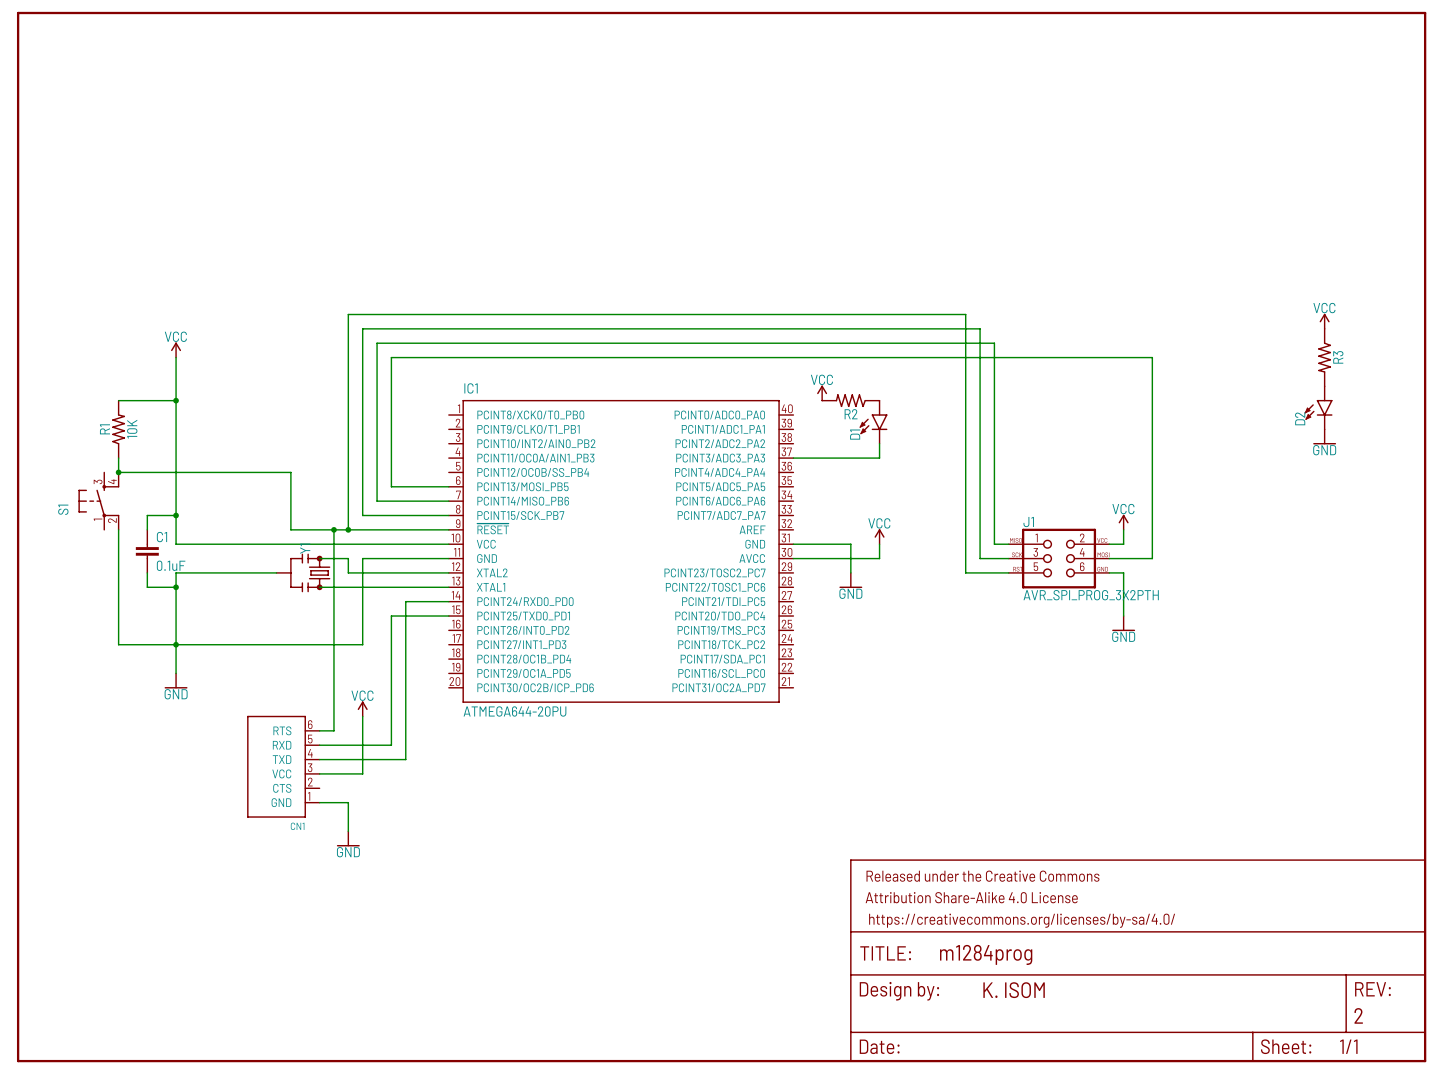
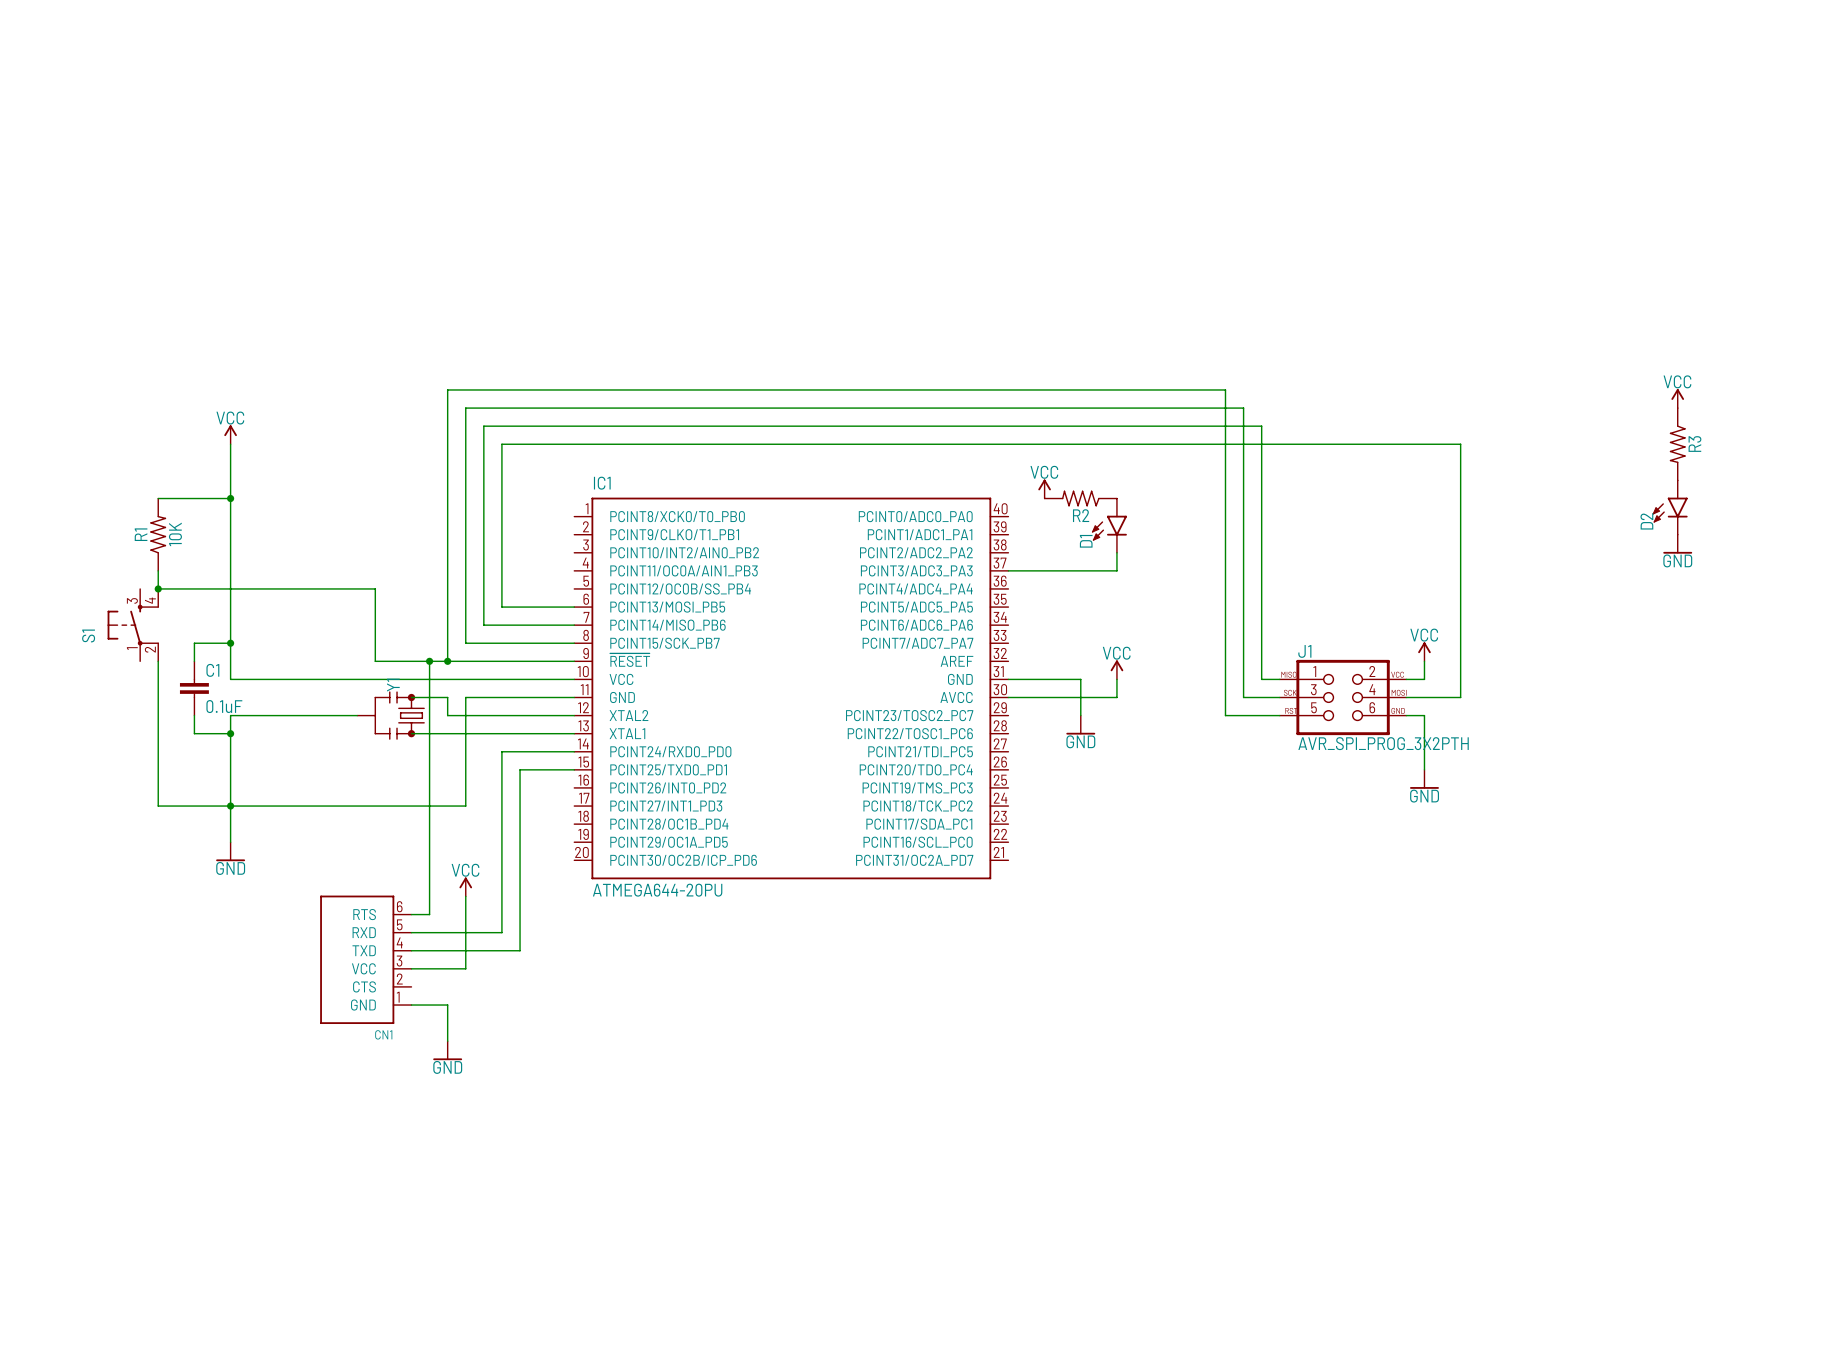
part: (721, 537) -> none
wire: (405, 601) (405, 616) (391, 616) -> (520, 751) (501, 751) (501, 769)
part: (1137, 960) -> none

